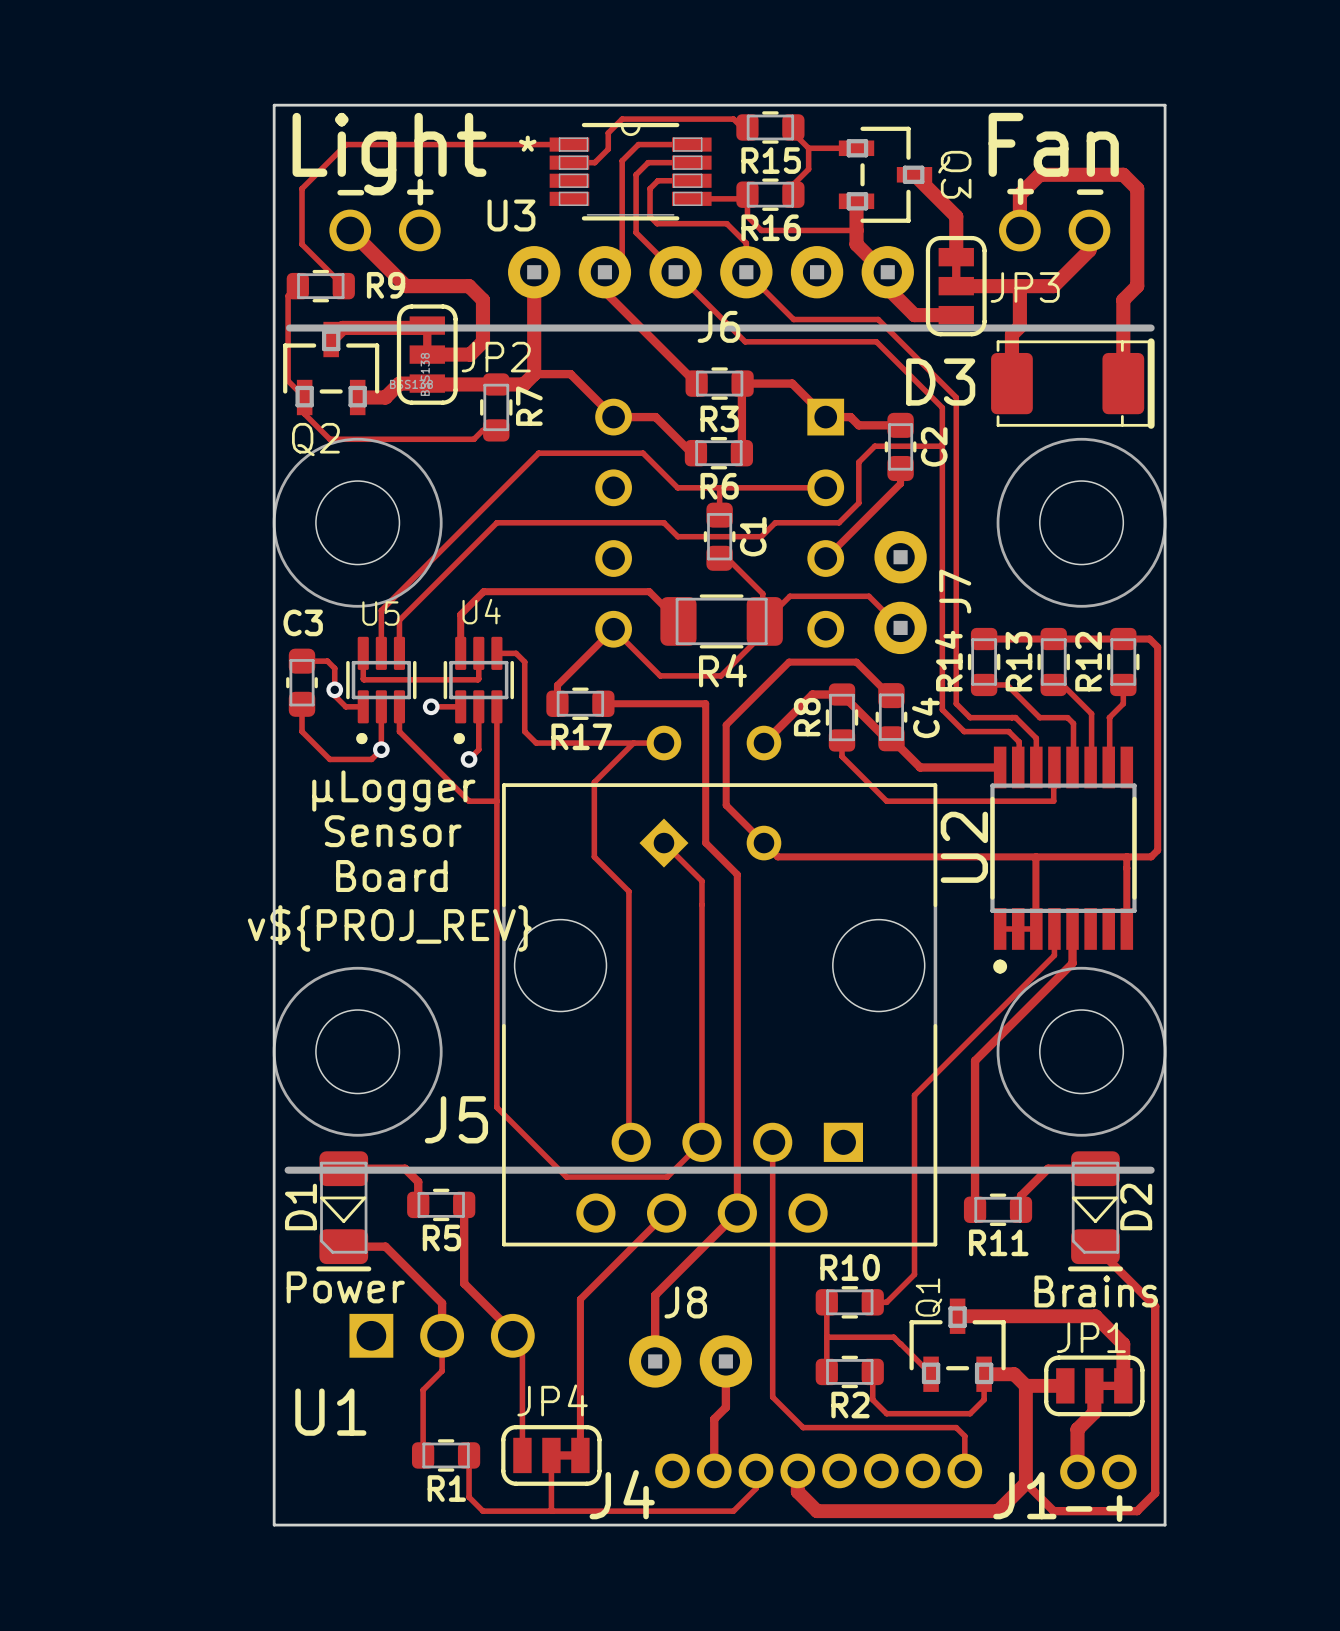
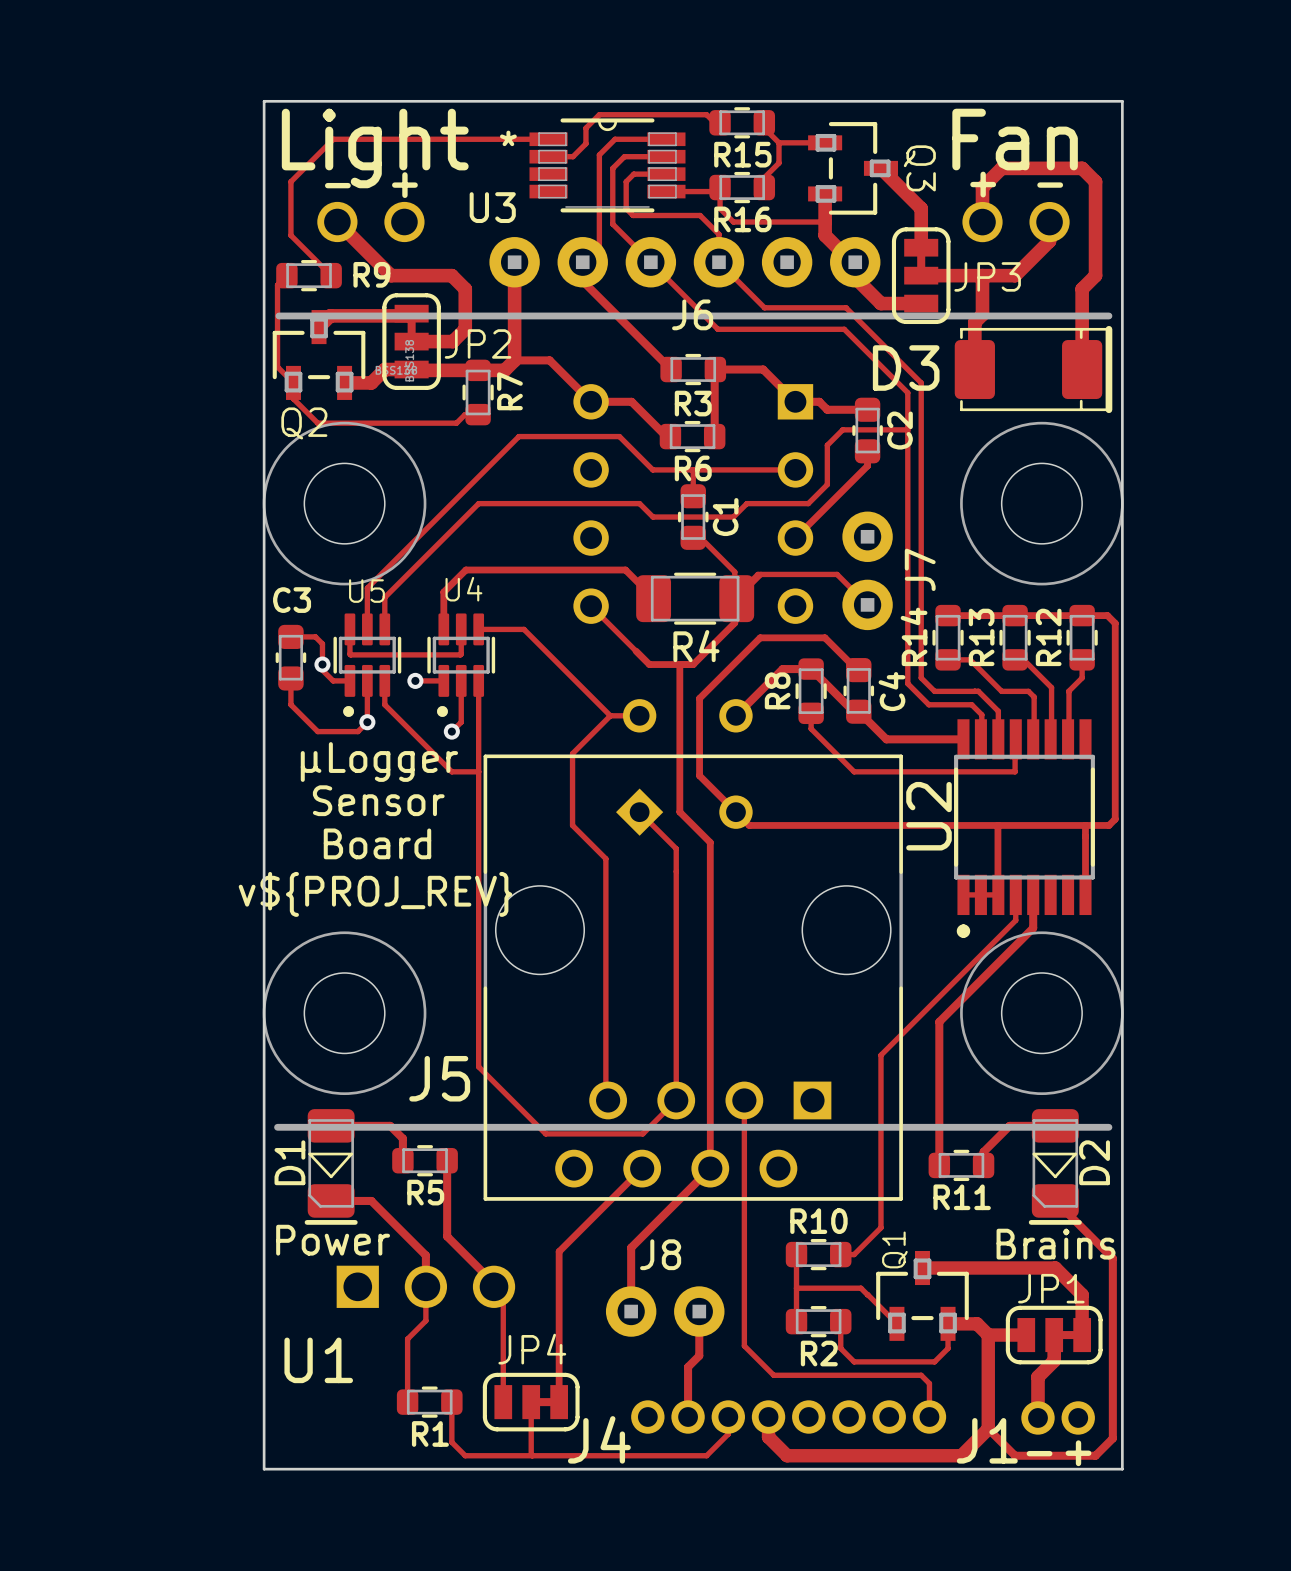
track: (770, 626) (721, 675) (660, 675) -> (760, 574) (757, 574) (734, 597) (734, 622) (693, 664) (649, 664) (636, 651)
track: (606, 636) (557, 685) (557, 703) -> none
track: (516, 653) (524, 661) (524, 731) (536, 743) (633, 743) -> (497, 629) (524, 629) (610, 715)
R17: (580, 703) -> none
track: (603, 703) (705, 703) -> (679, 664) (679, 677)

